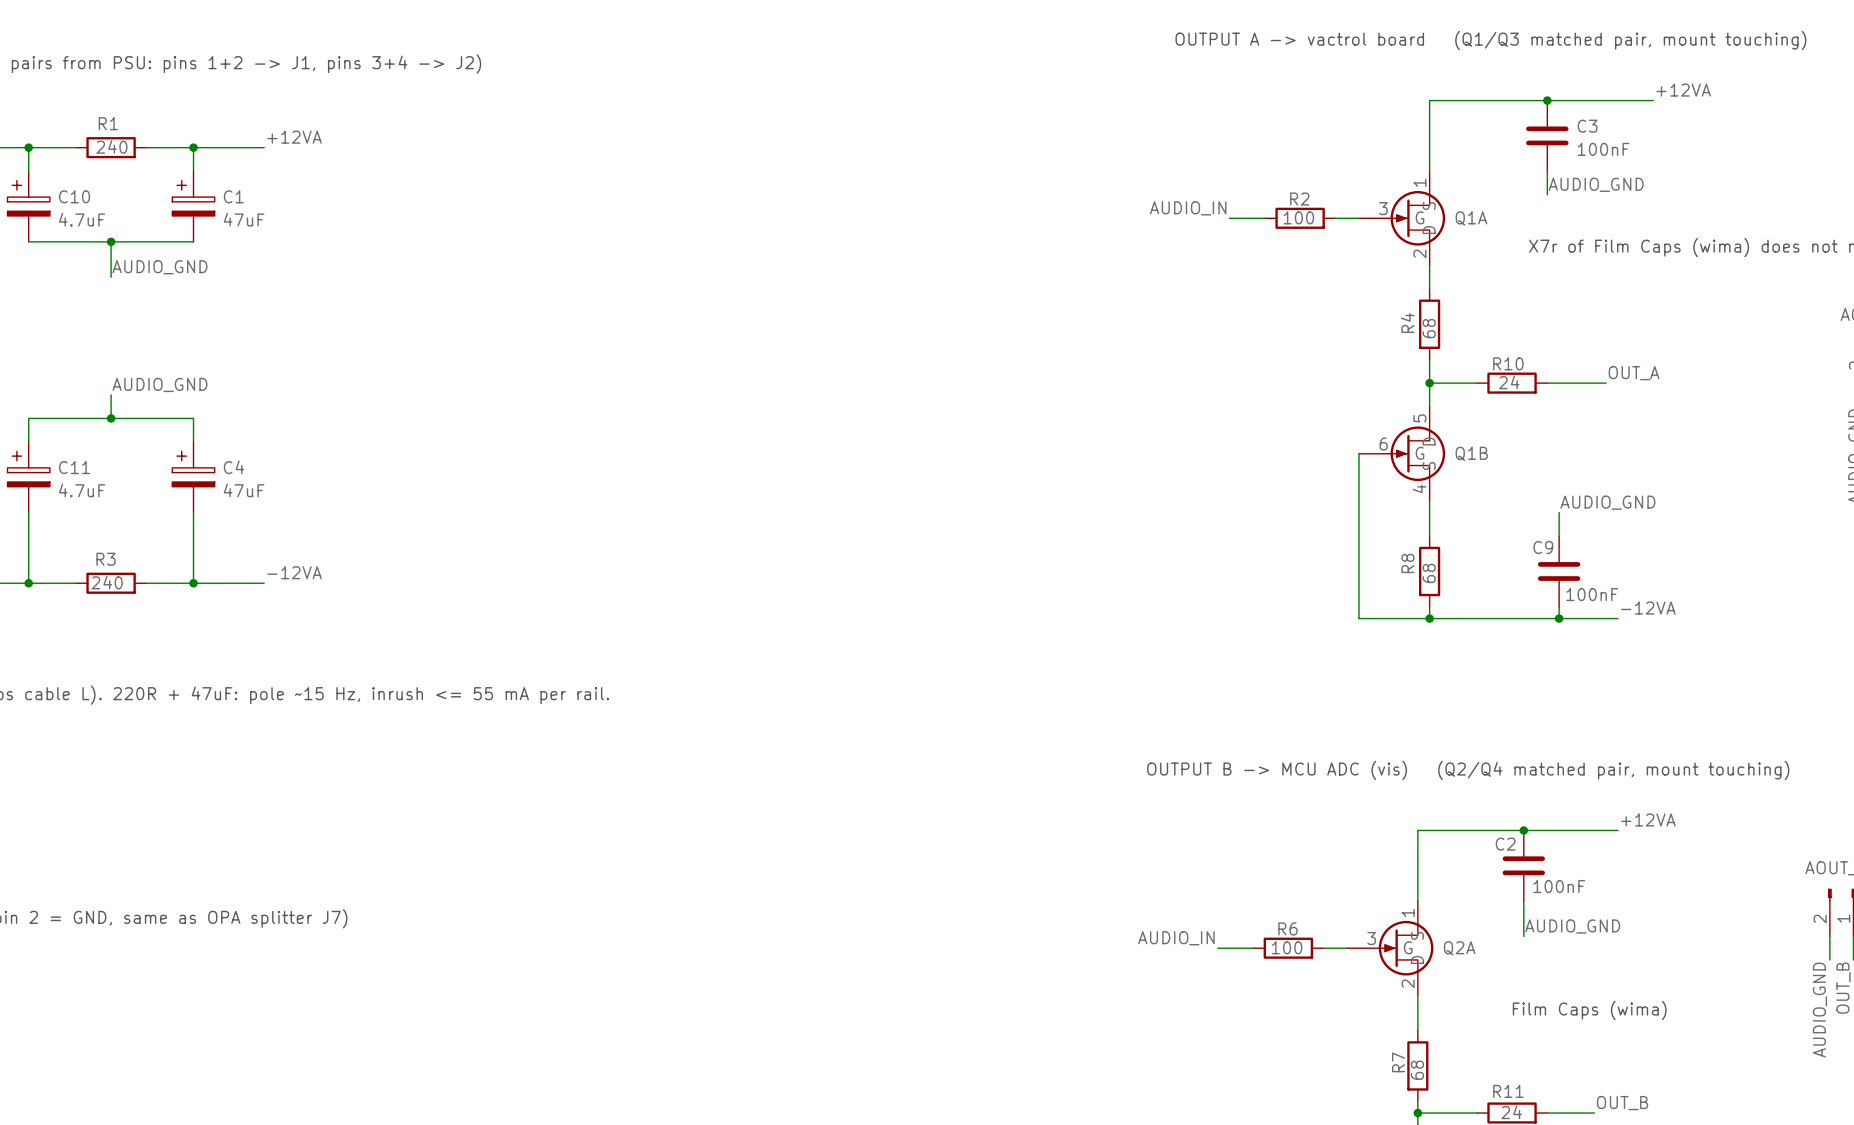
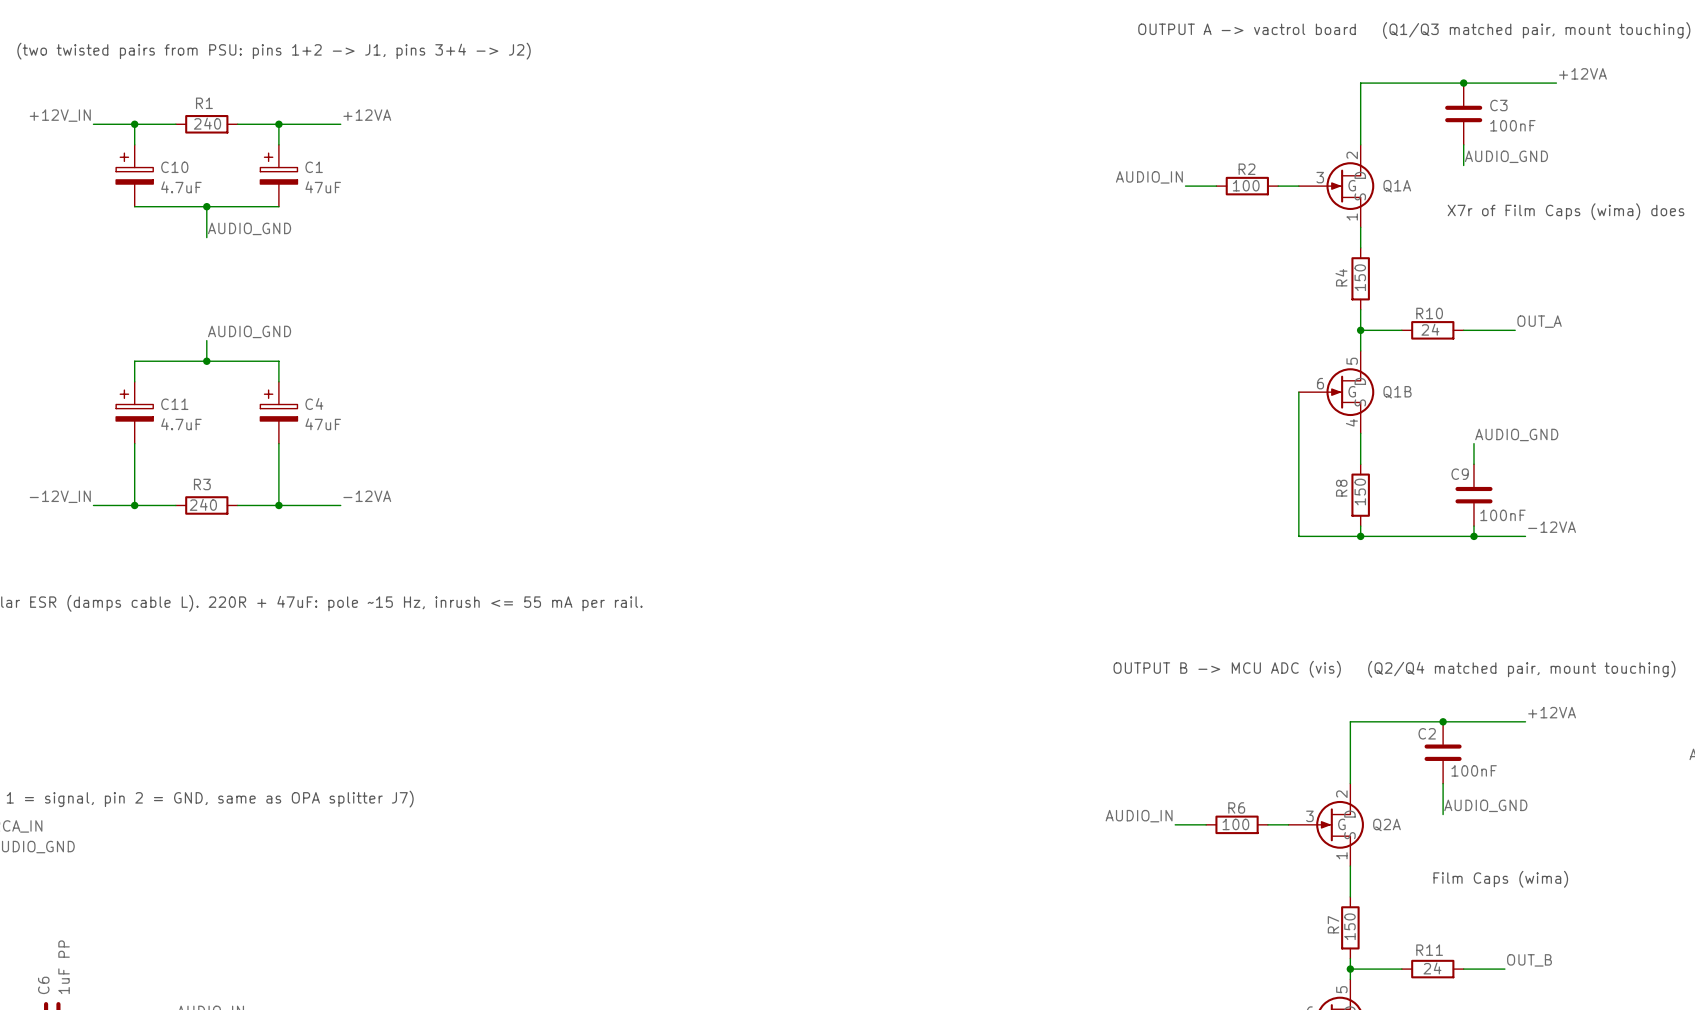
Q1A flip: as is (1417, 218) -> up-down (1350, 186)
R4 value: 68 (1429, 328) -> 150 (1360, 277)
R8 value: 68 (1429, 573) -> 150 (1360, 492)
Q2A flip: as is (1406, 948) -> up-down (1340, 824)
R7 value: 68 (1417, 1070) -> 150 (1349, 926)

